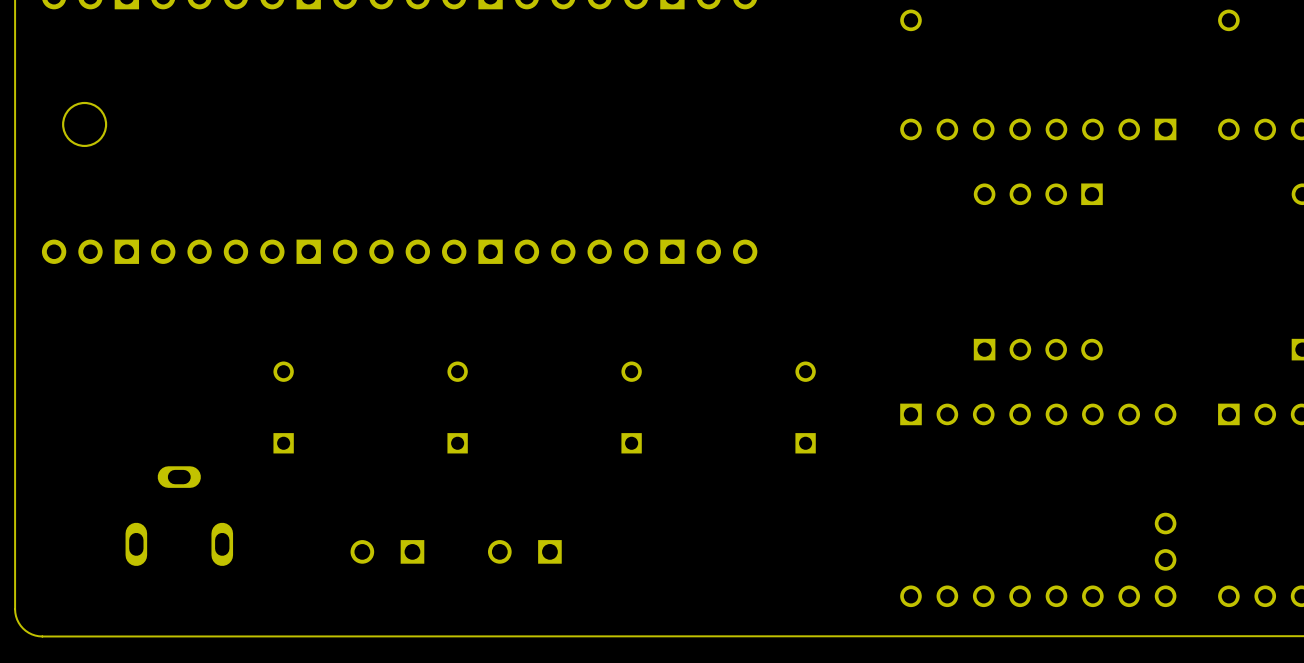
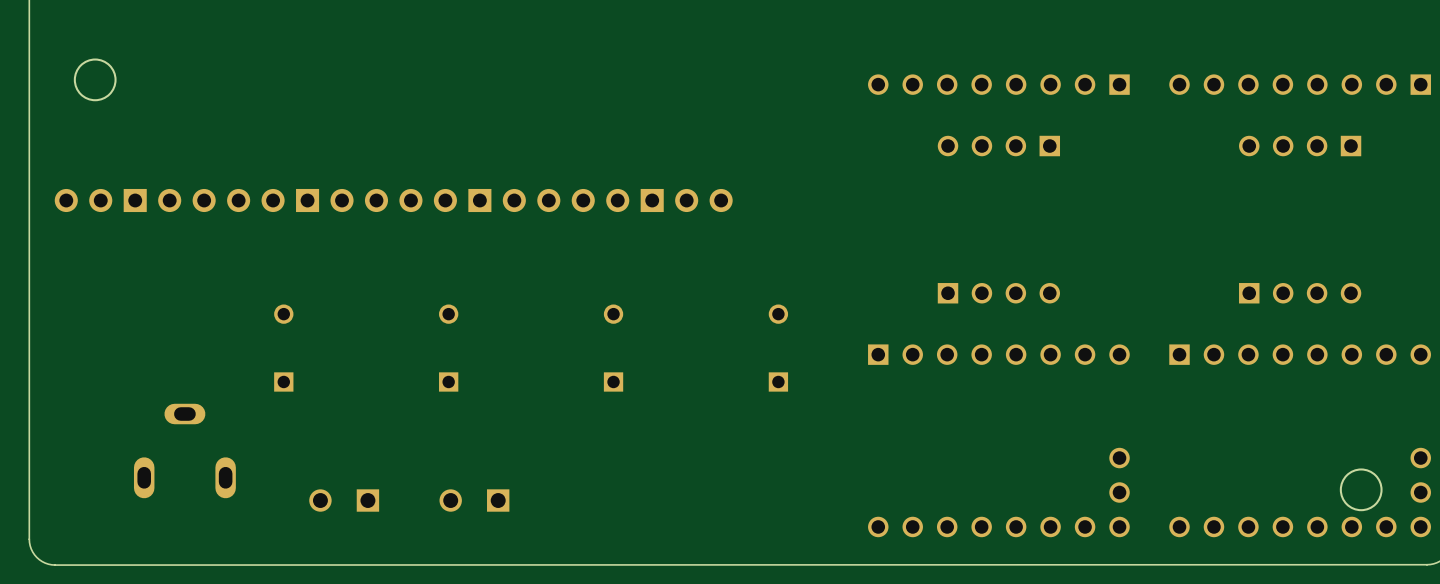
part position: (387, 551) -> (344, 500)
part position: (524, 551) -> (474, 500)

